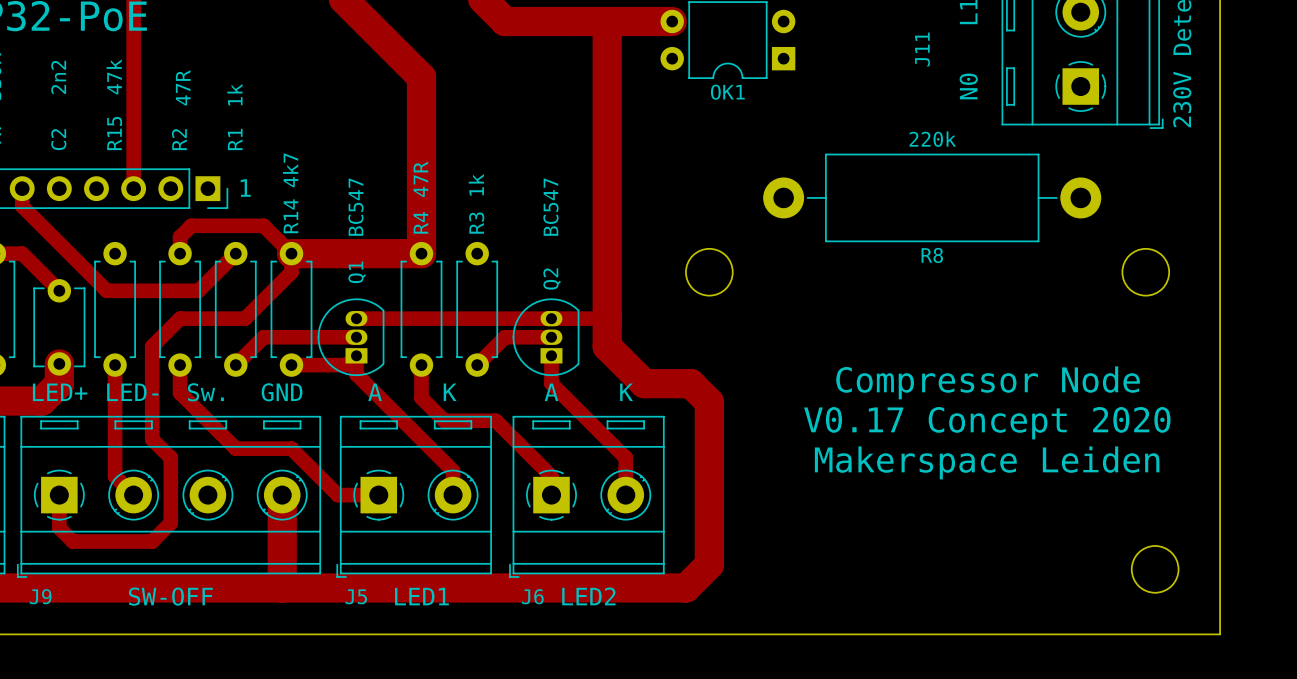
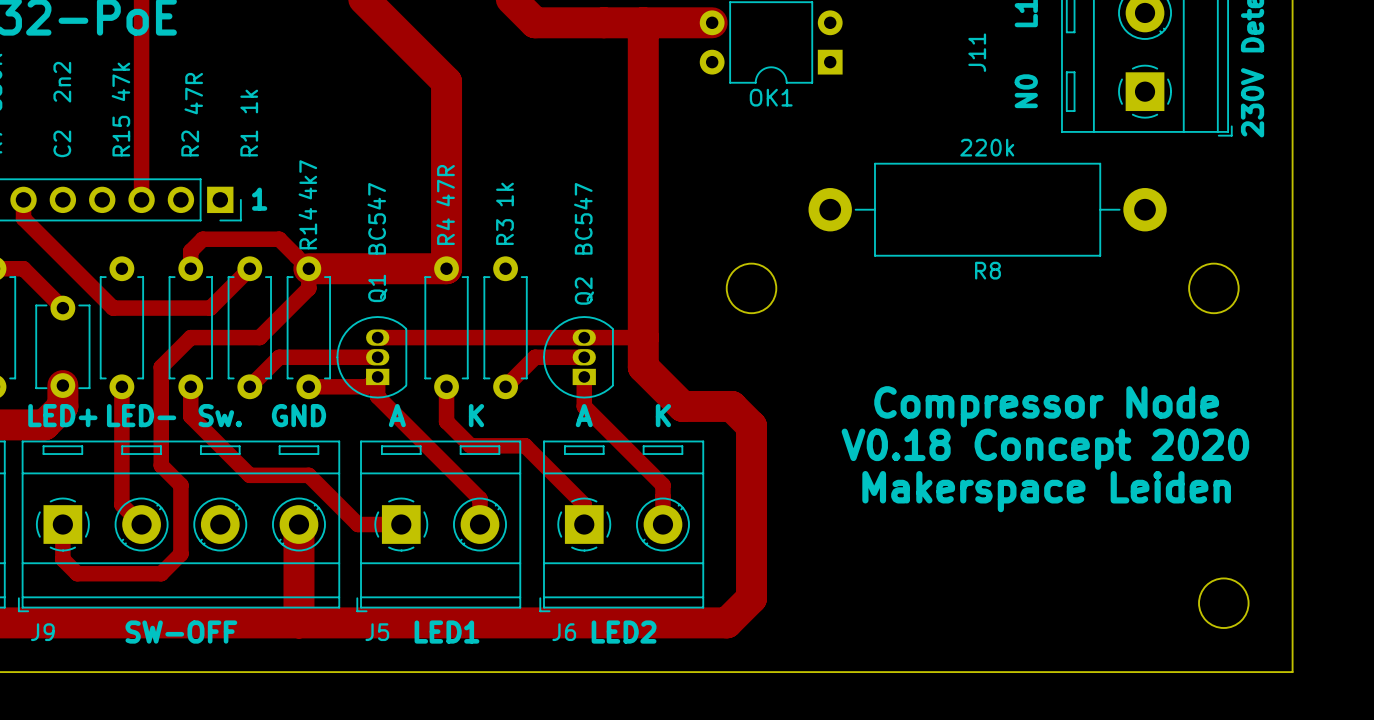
text: V0.17 Concept 2020 (987, 423) -> V0.18 Concept 2020 (1045, 449)

